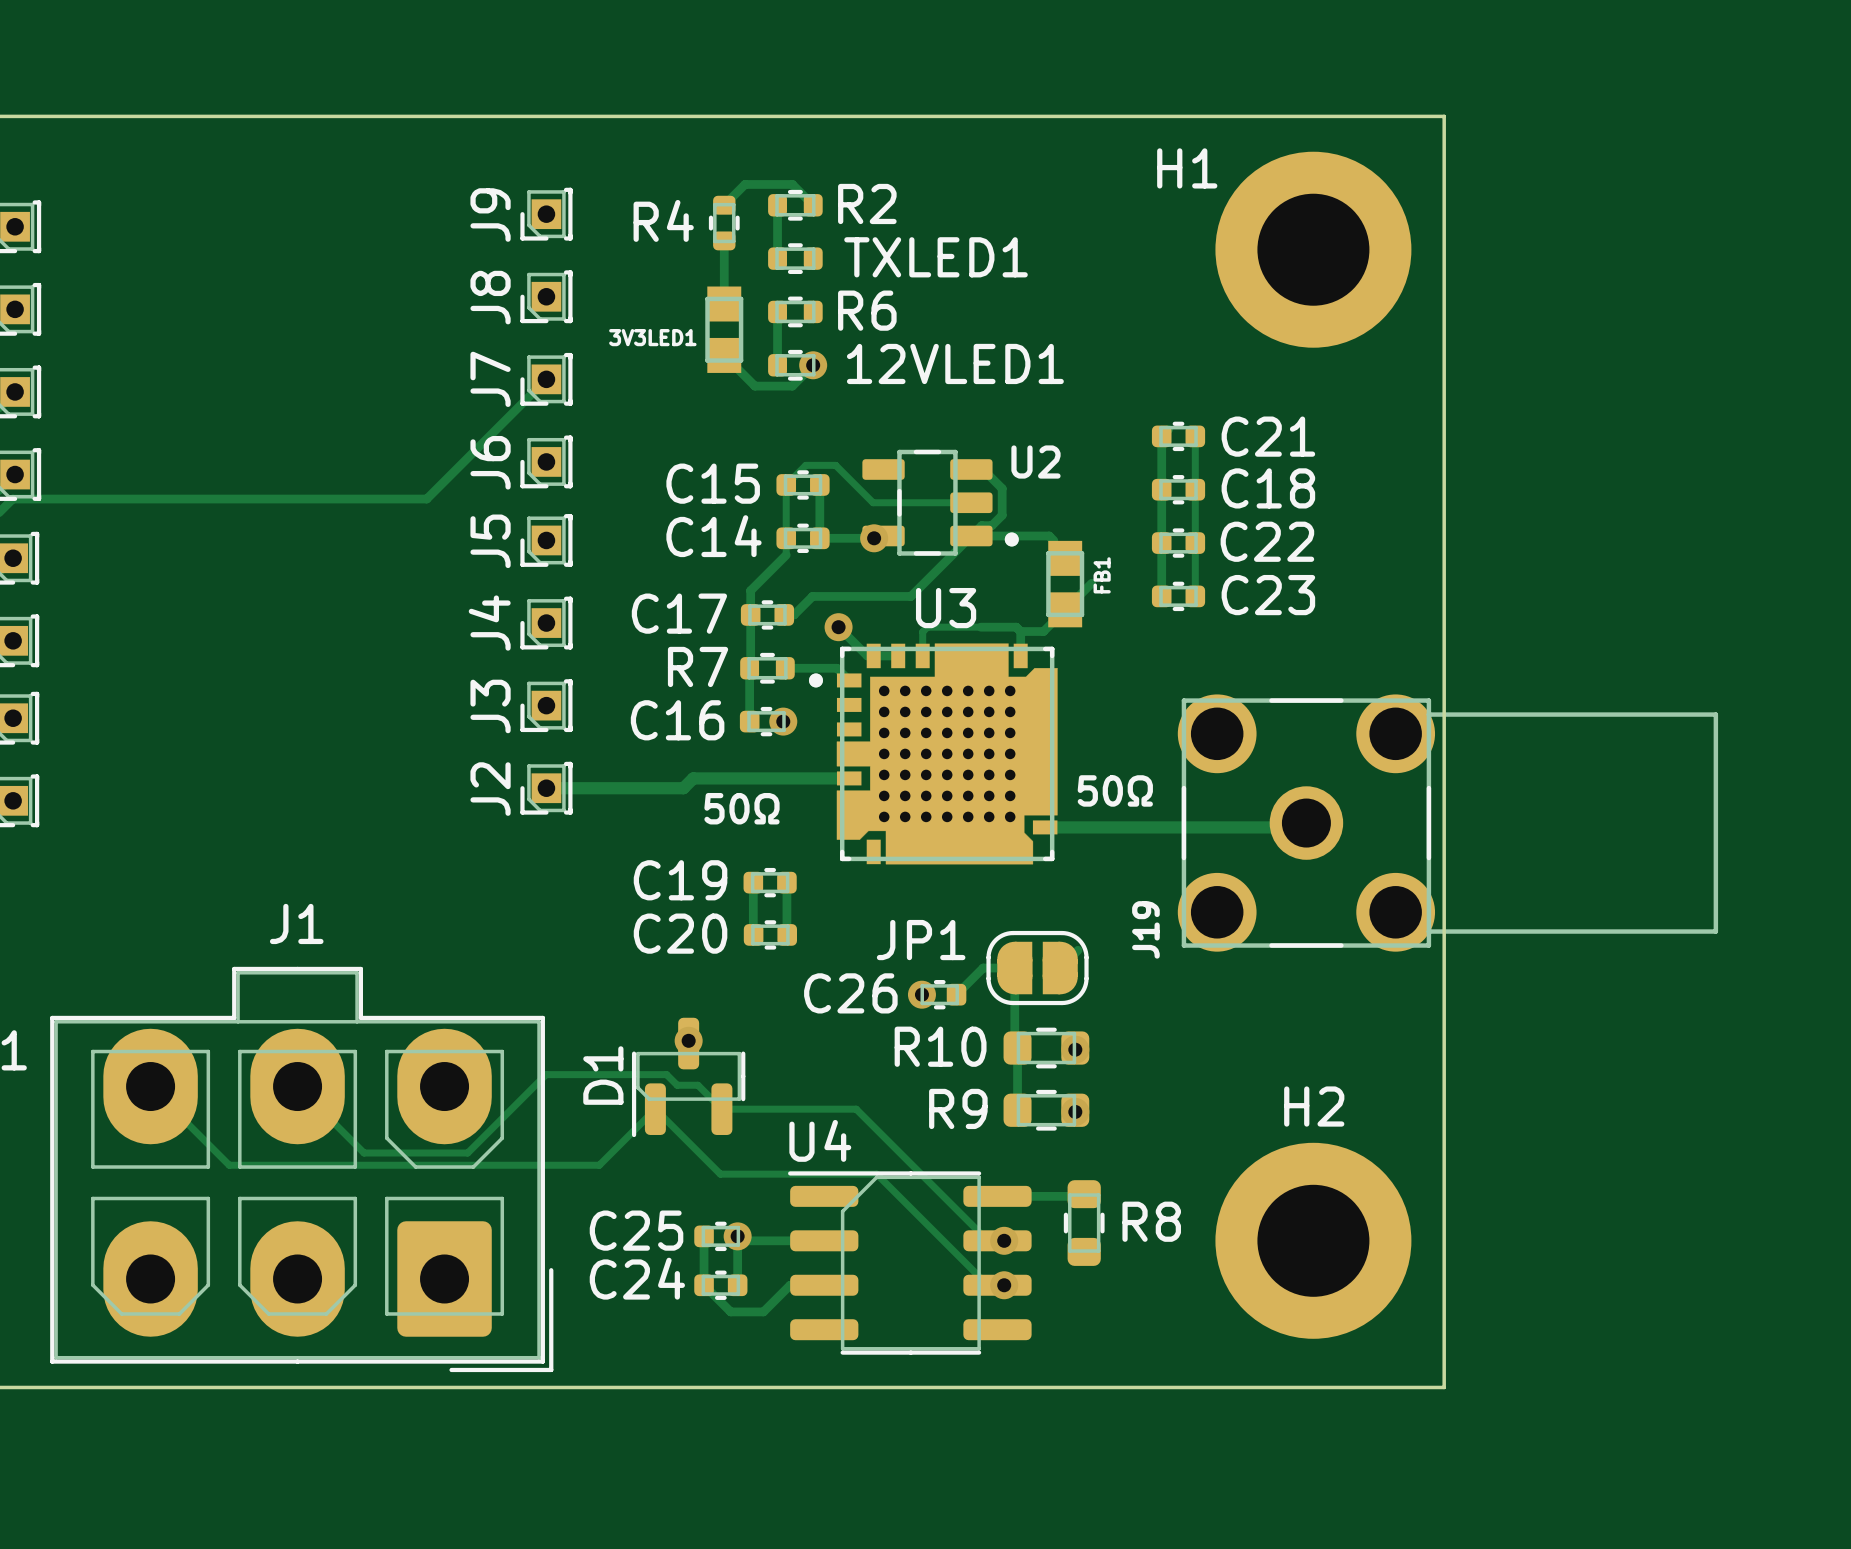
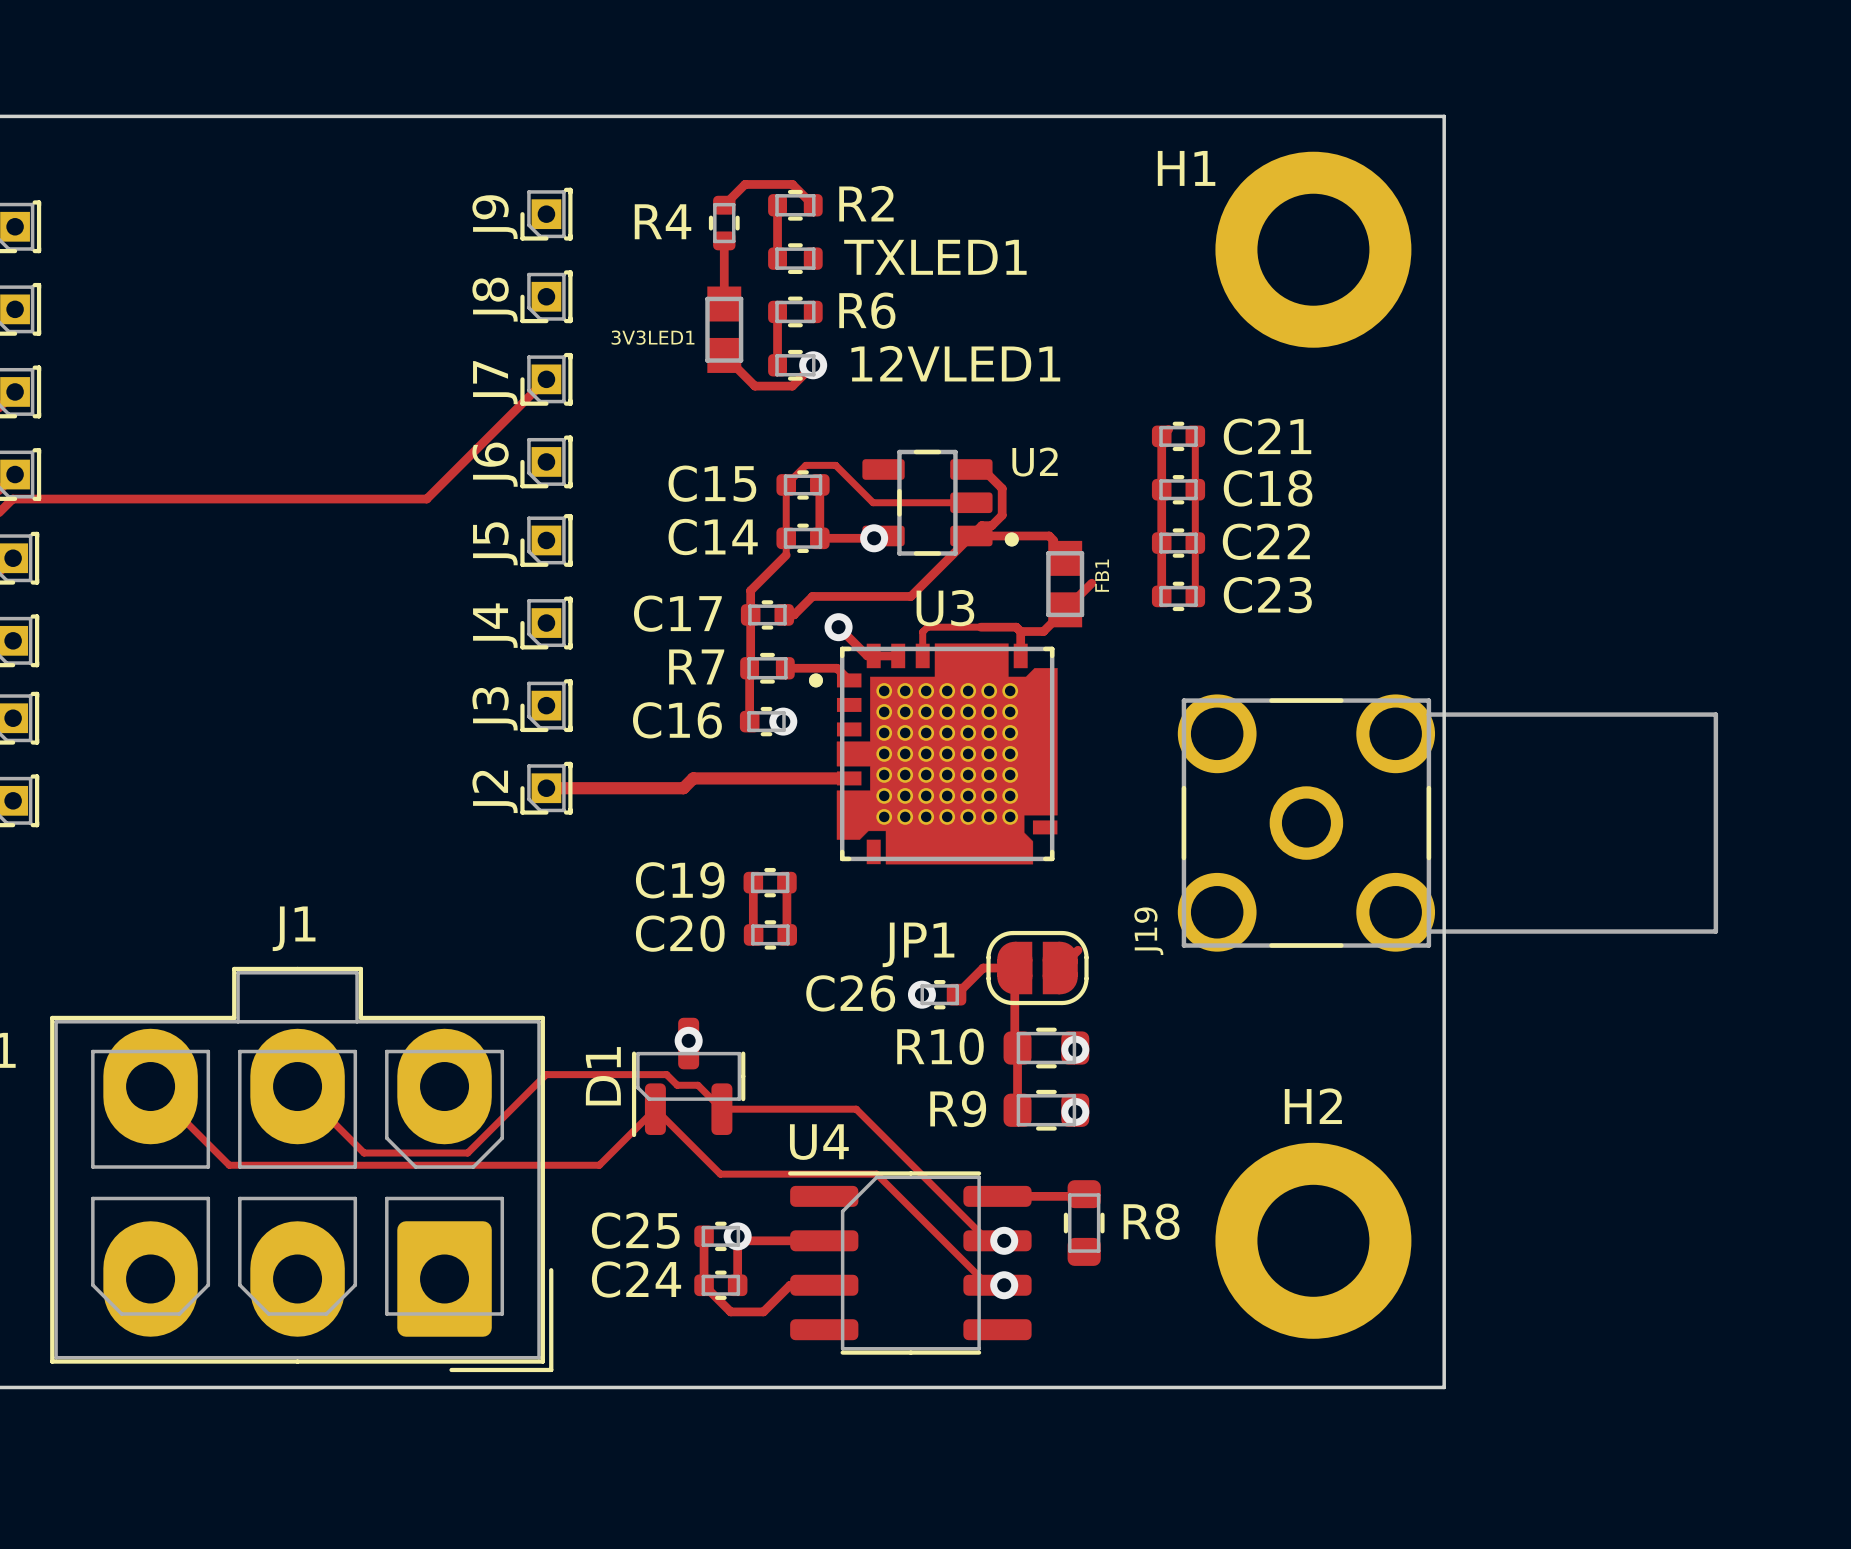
text: 50Ω (1115, 790) -> none
text: 50Ω (741, 808) -> none
track: (1306, 823) (1302, 827) (1045, 827) -> none

